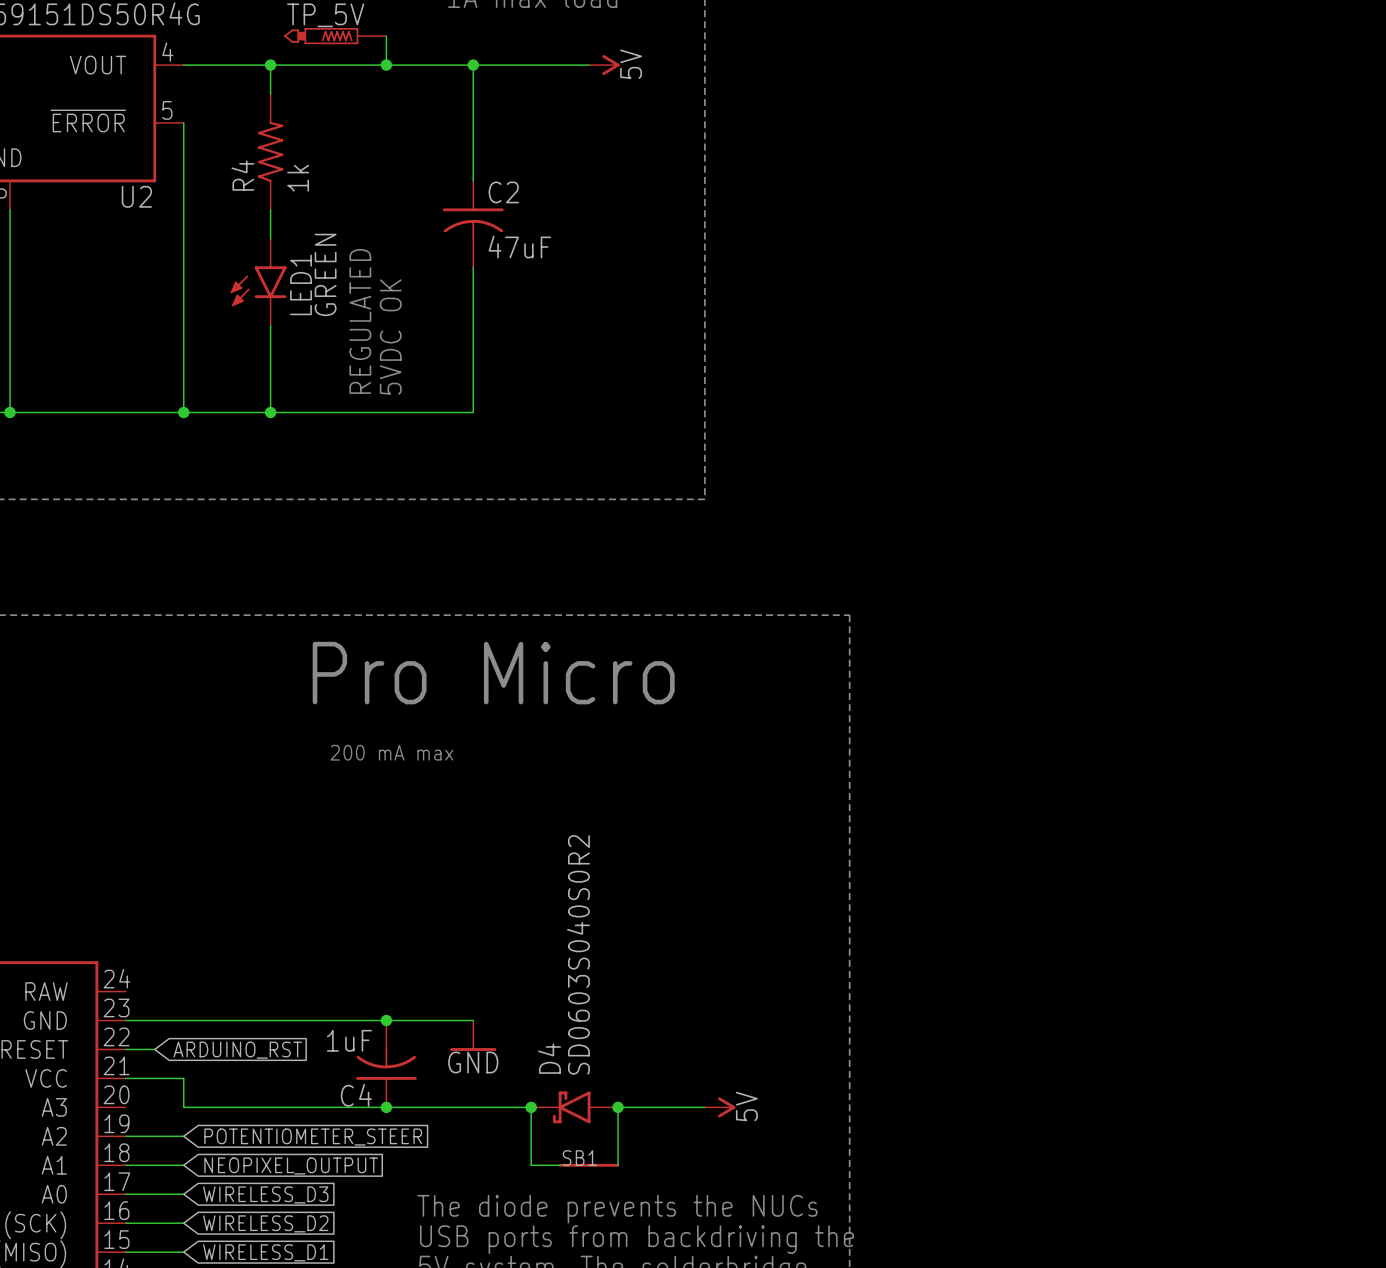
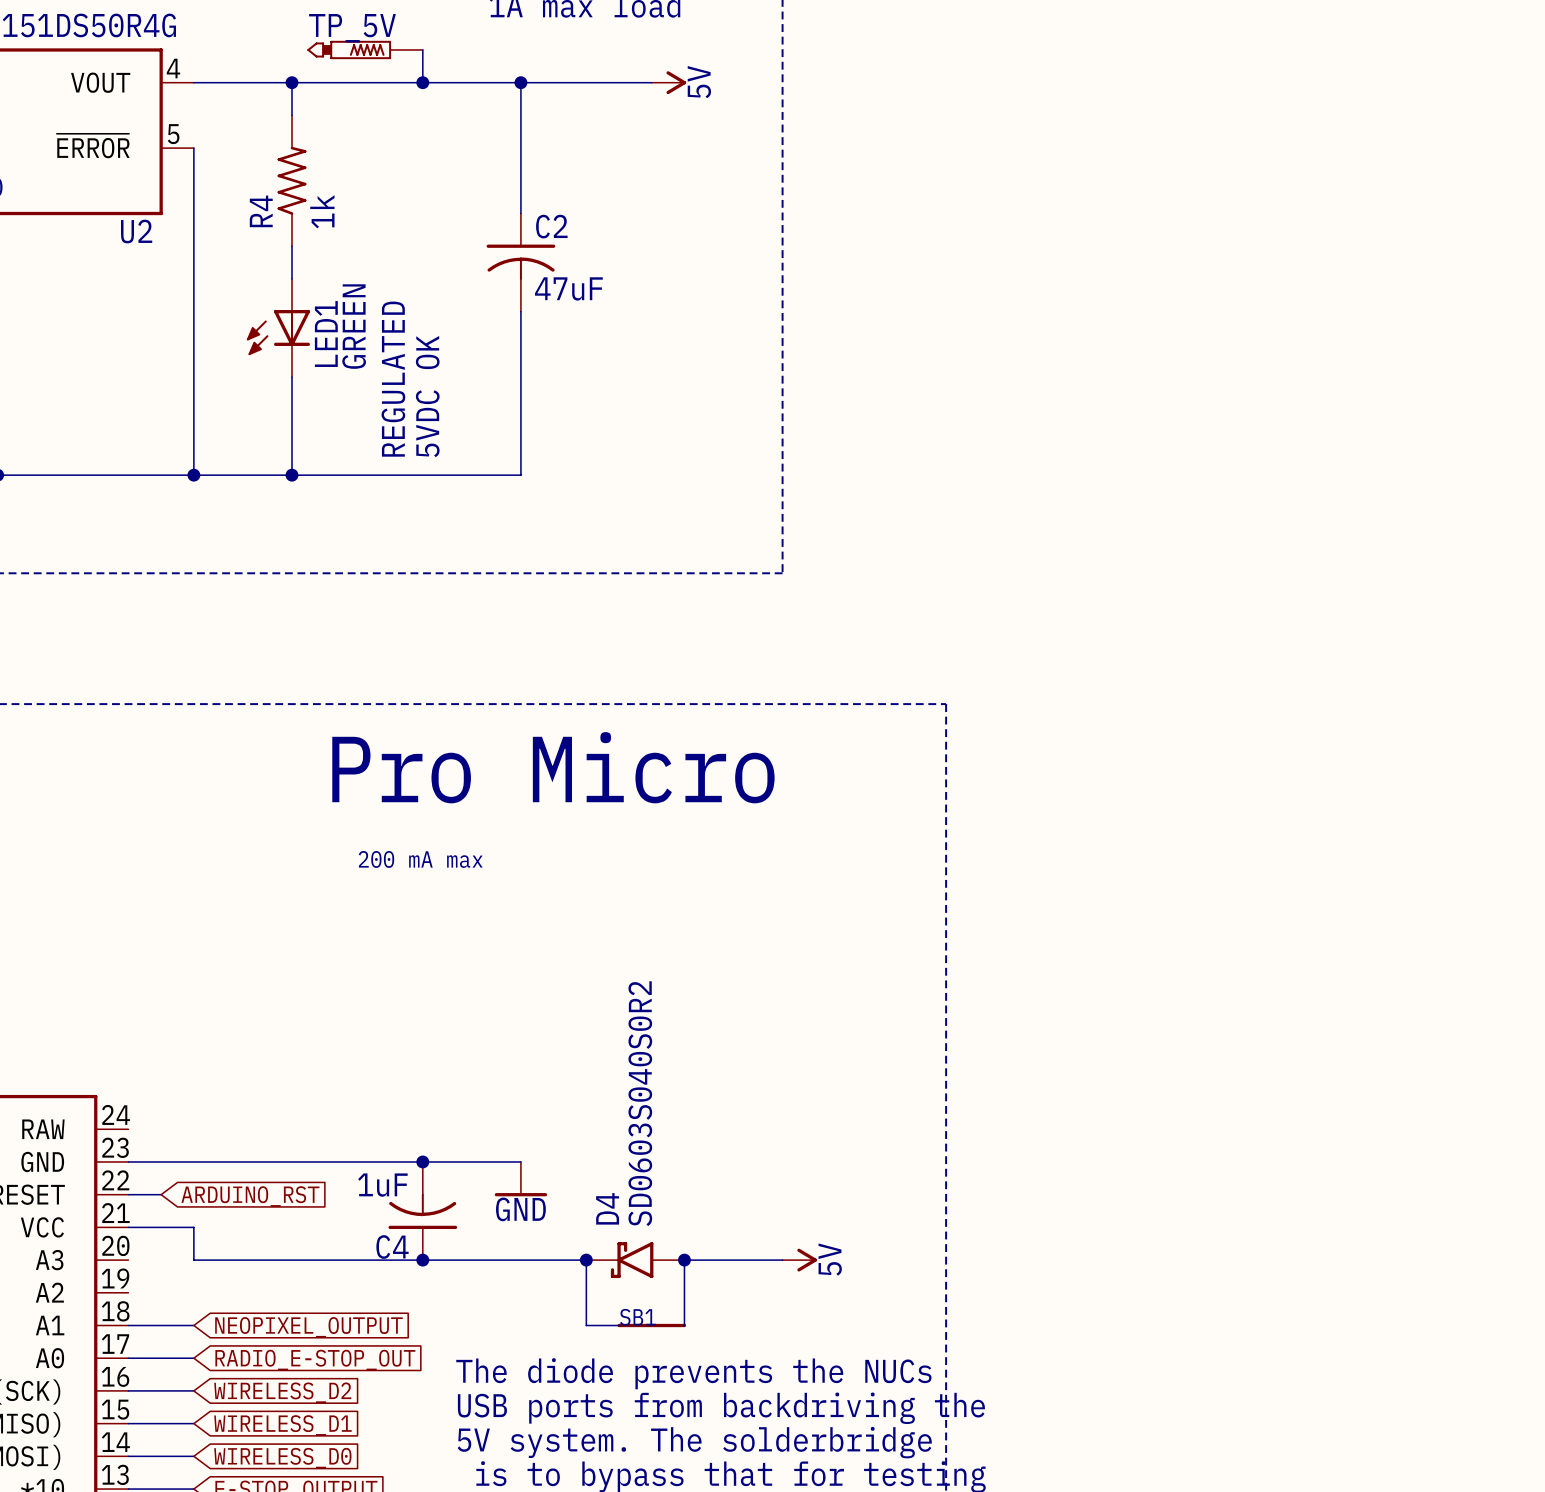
LED1 symbol: [230, 238, 287, 326] -> [246, 278, 310, 378]
wire: (125, 1136) (183, 1136) -> none
global label: POTENTIOMETER_STEER (313, 1137) -> none
global label: WIRELESS_D3 (265, 1194) -> RADIO_E-STOP_OUT (315, 1360)

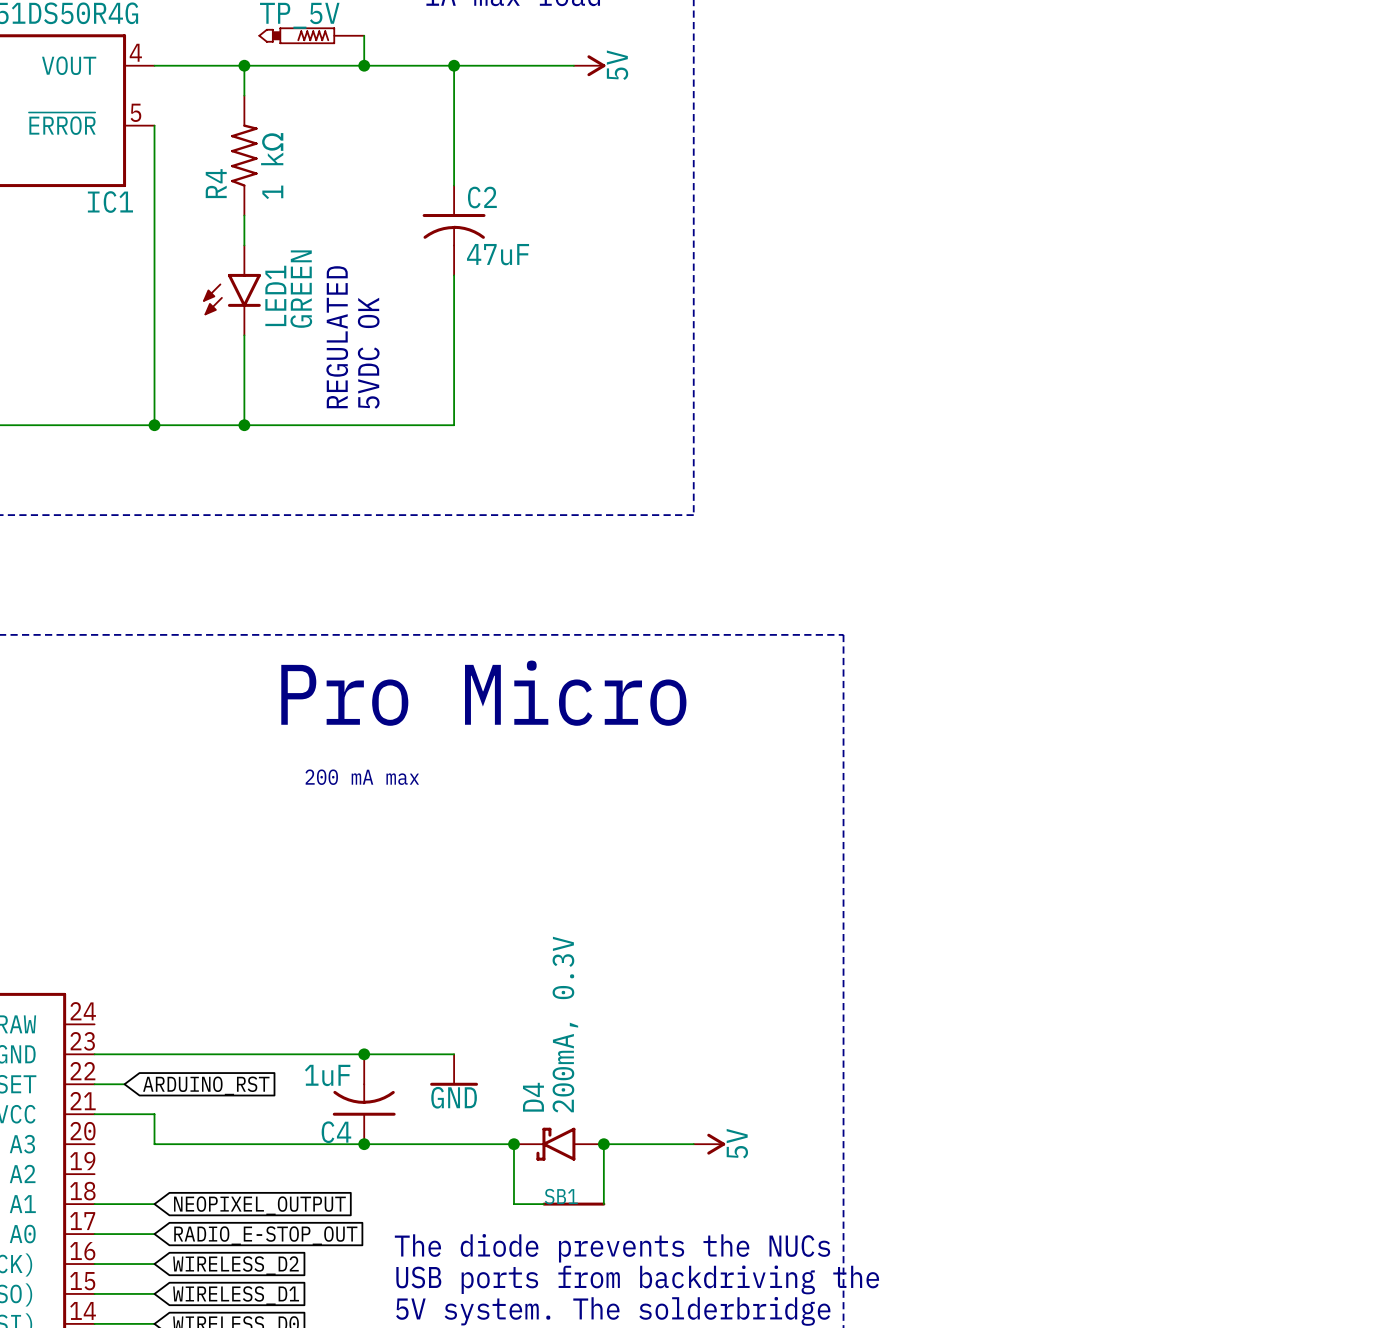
R4 value: 1k (322, 211) -> 1 kΩ (272, 166)
U2 name: U2 (136, 231) -> IC1 (110, 202)
LED1 symbol: [246, 278, 310, 378] -> [203, 245, 261, 336]
D4 value: SD0603S040S0R2 (640, 1103) -> 200mA, 0.3V (565, 1024)

